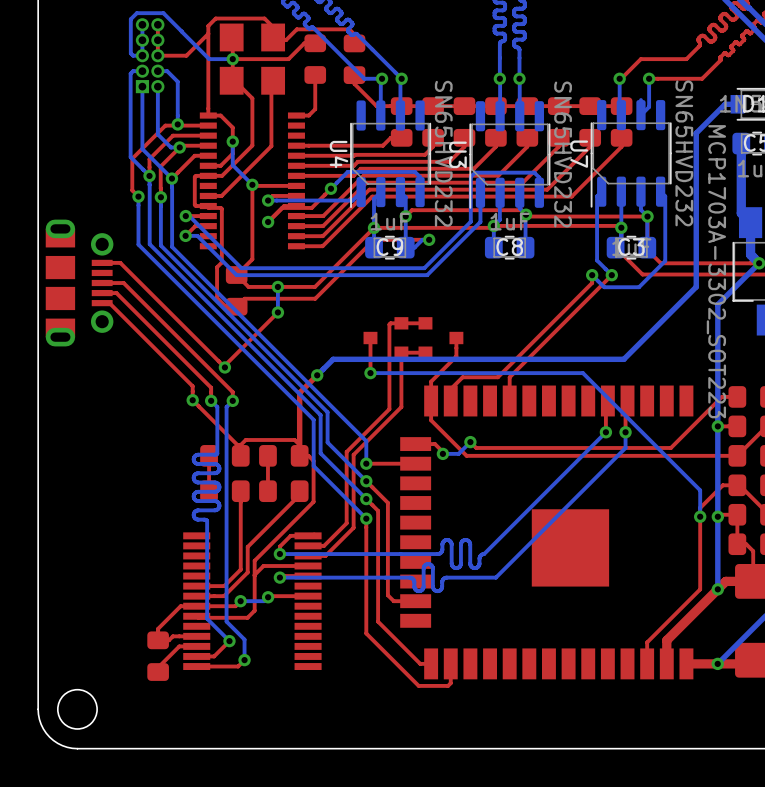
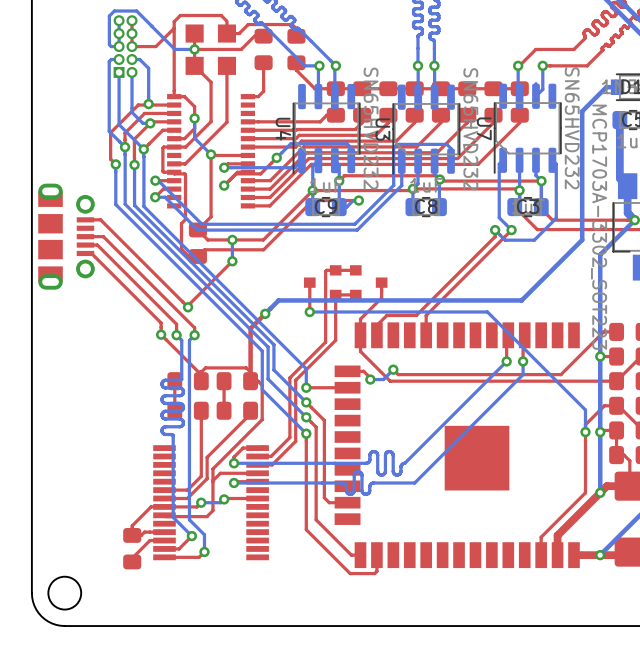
part footprint: [219, 23, 286, 95] -> [185, 24, 237, 75]

